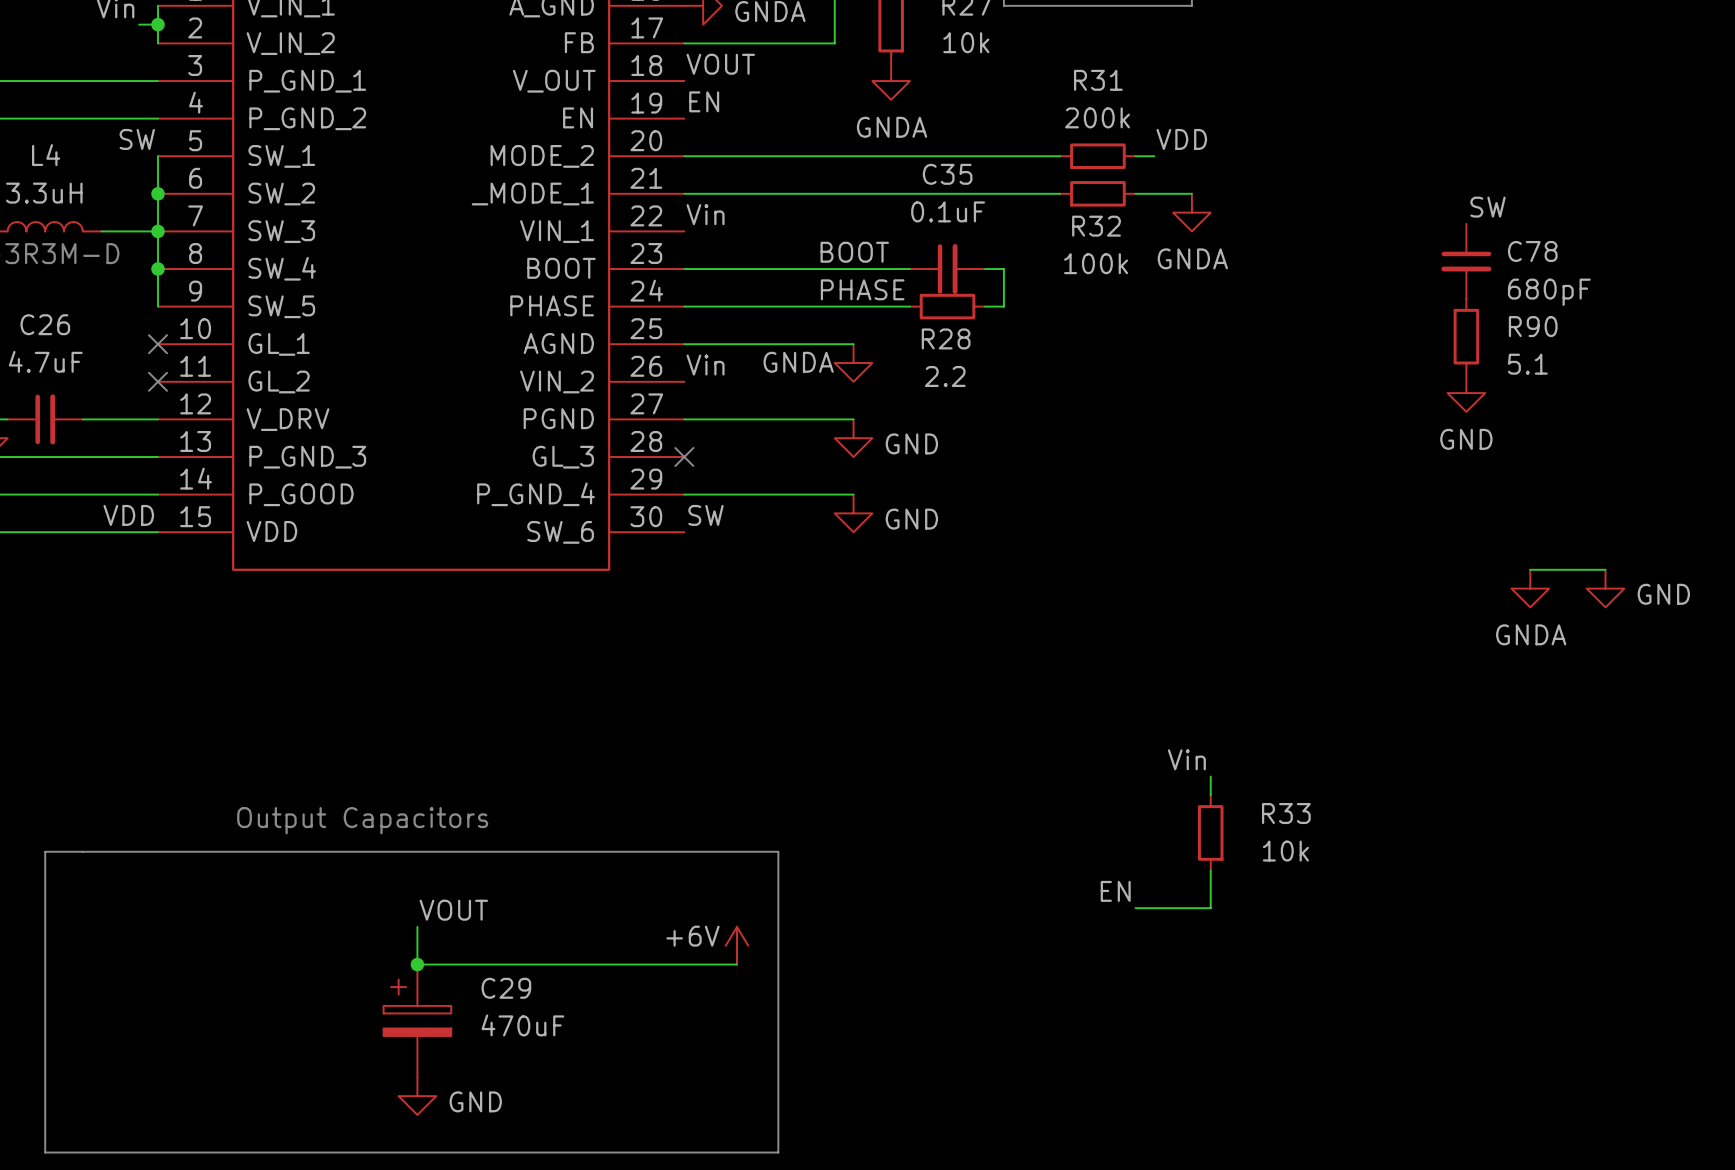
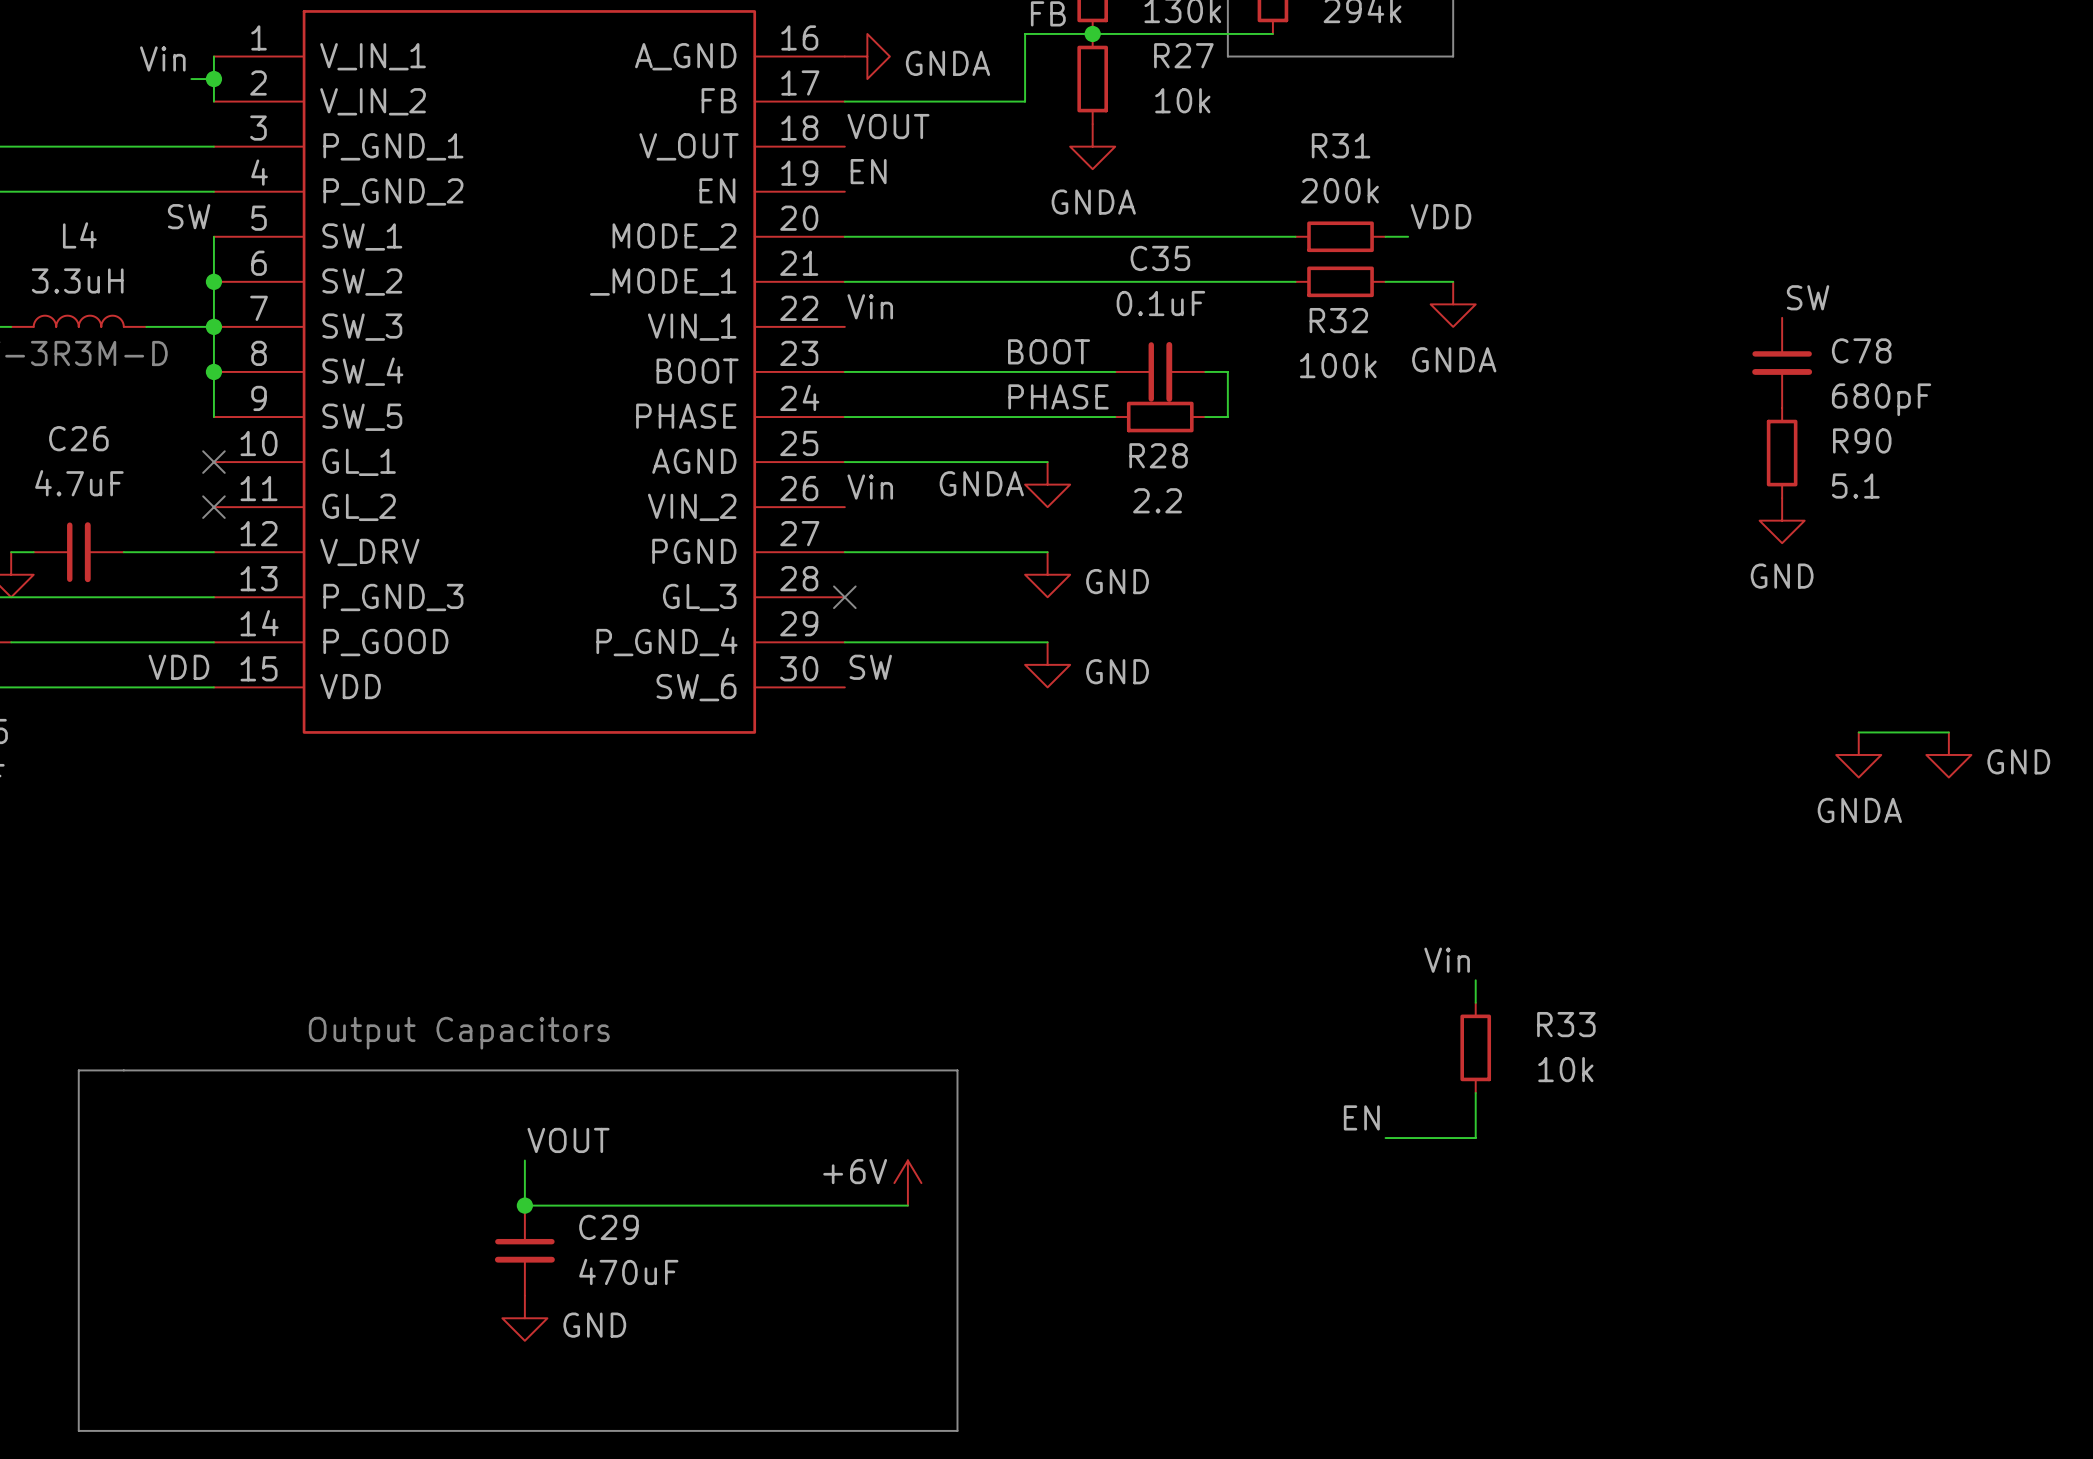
C29 symbol: [383, 964, 452, 1078] -> [494, 1205, 555, 1296]
power symbol position: GND (417, 1096) -> GND (524, 1318)

